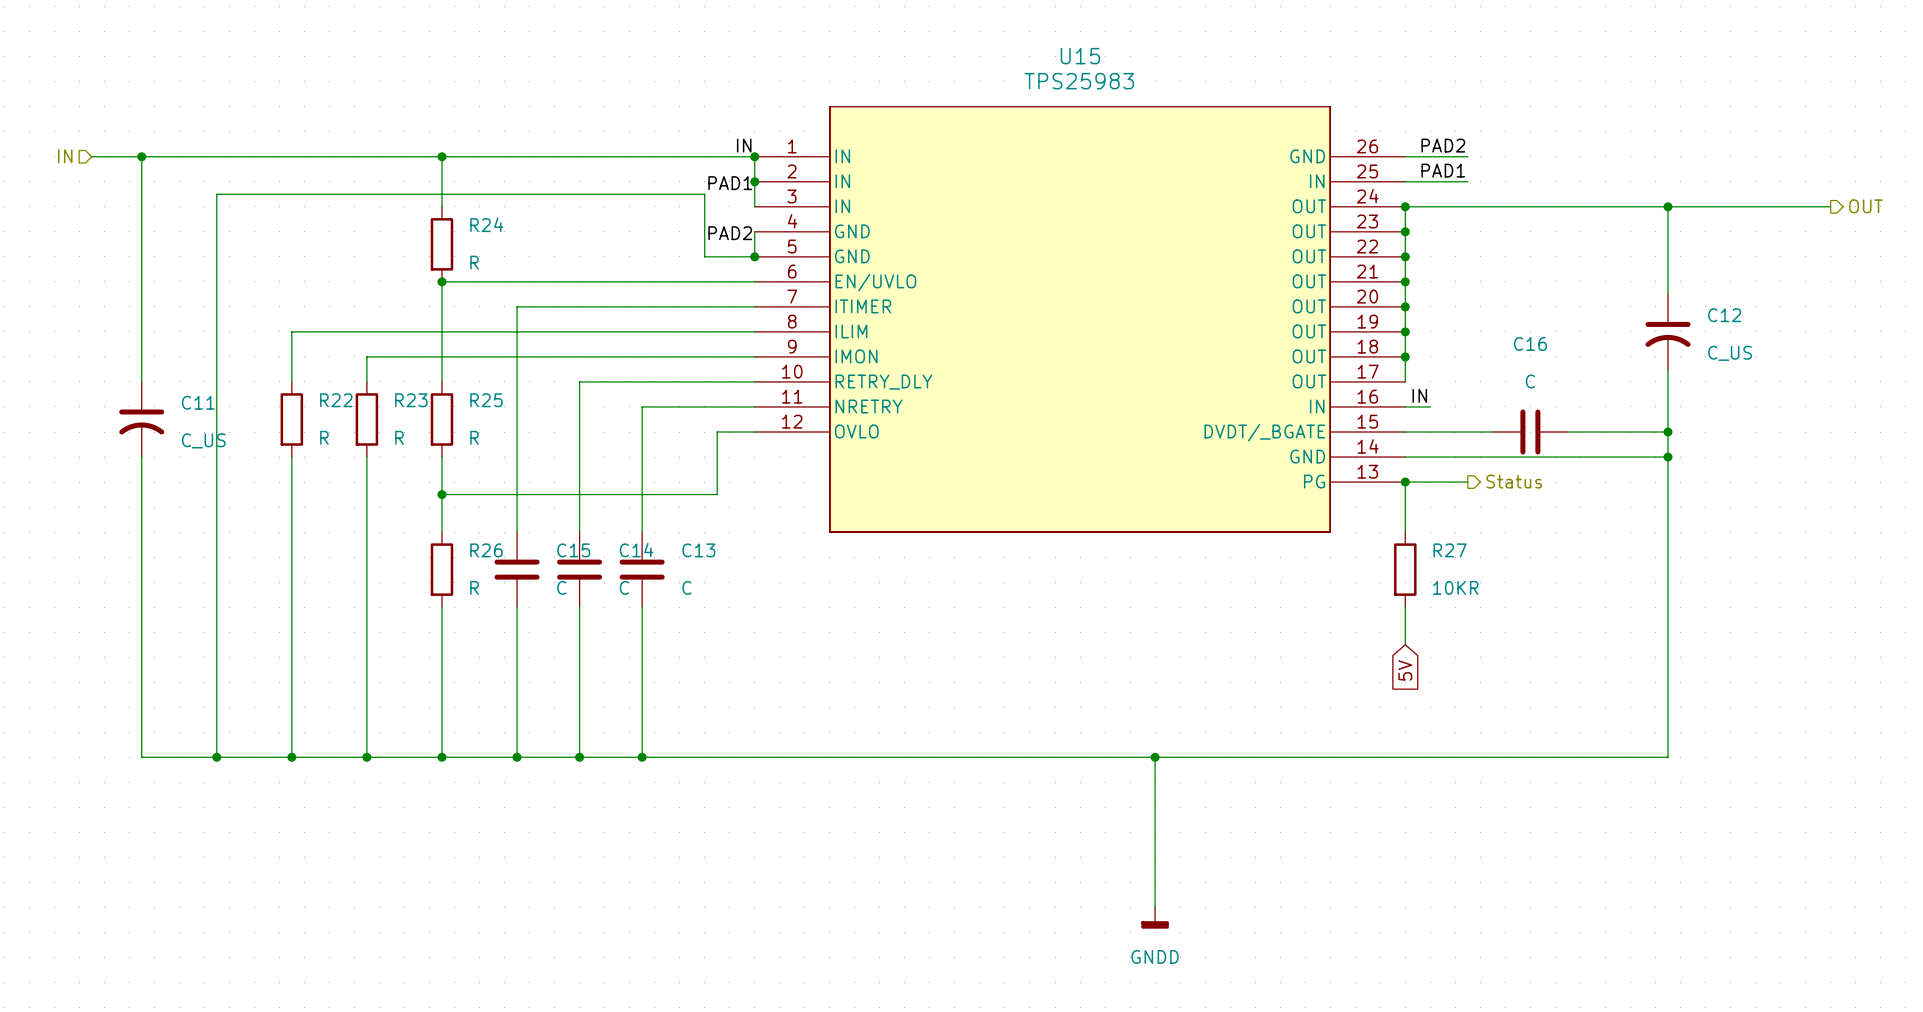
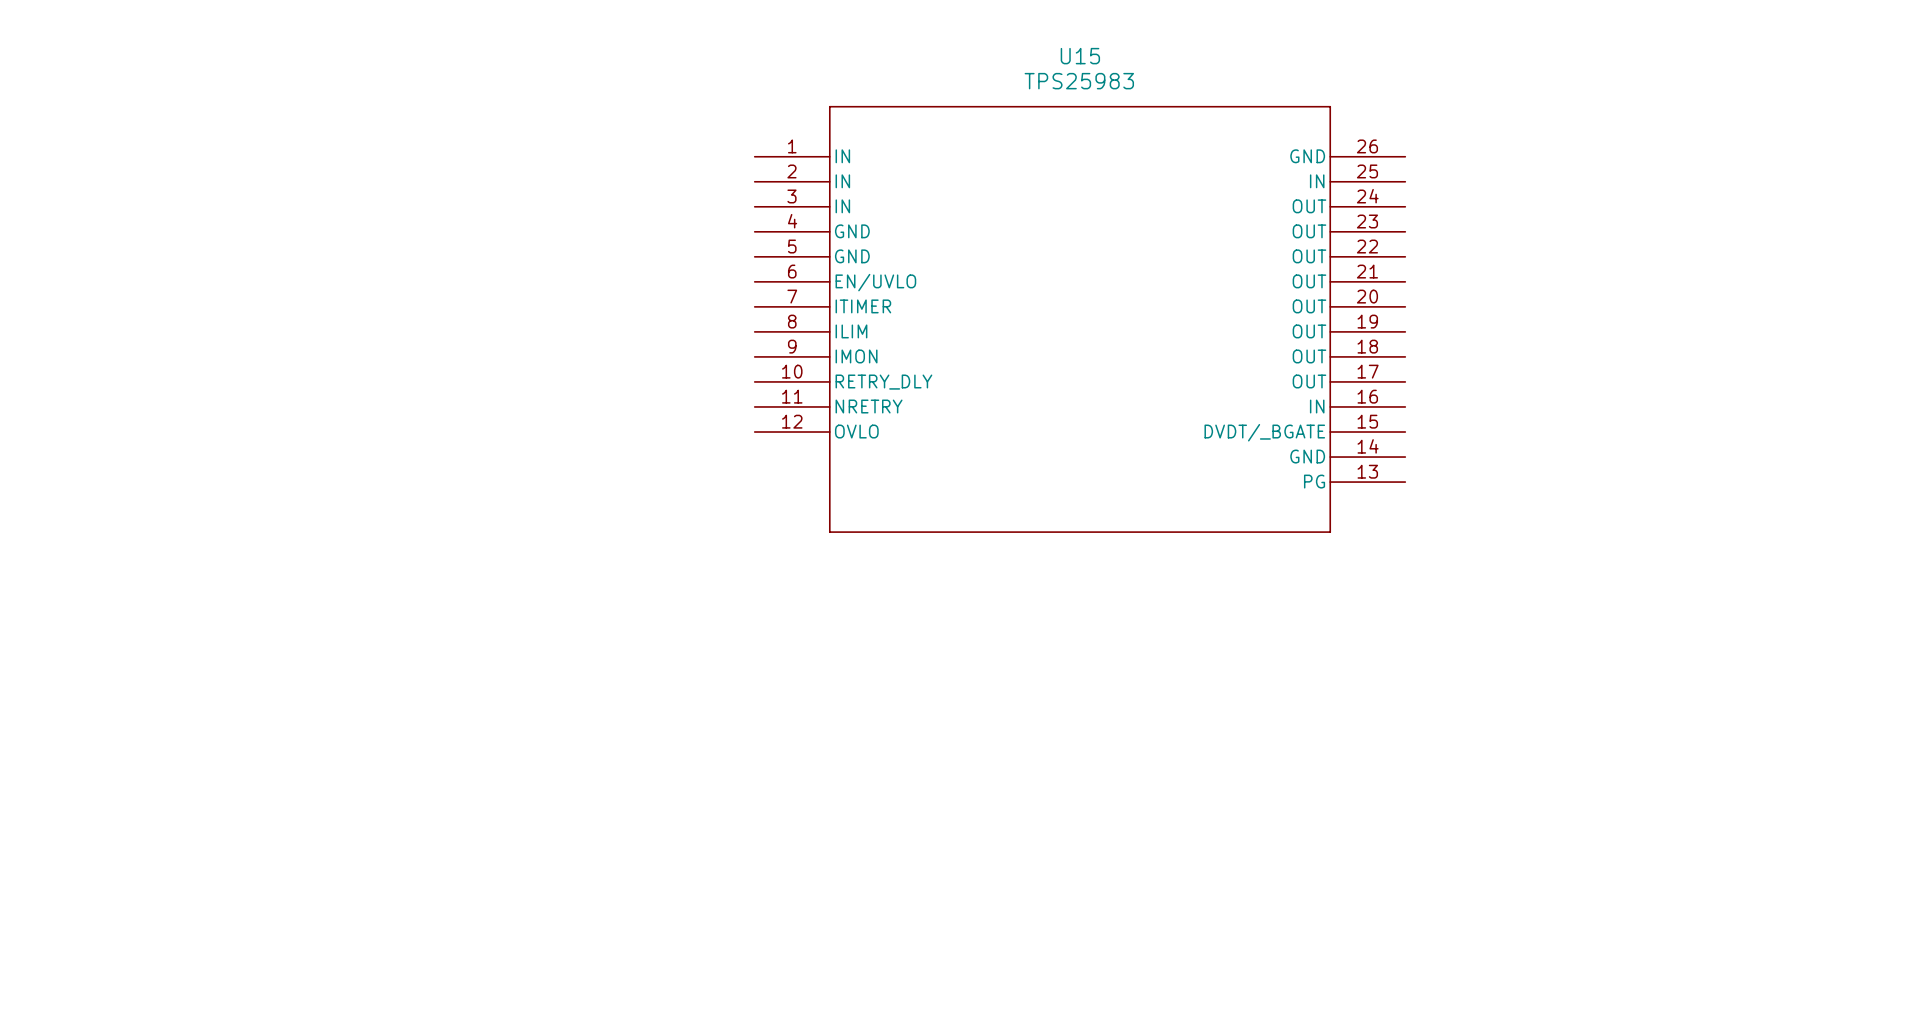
U15 symbol: [754, 106, 1406, 533] -> [754, 106, 1406, 533]
label: IN (744, 145) -> none
label: PAD2 (1443, 145) -> none
hierarchical label: IN (65, 156) -> none
wire: (91, 156) (754, 156) (754, 206) -> none
wire: (141, 156) (141, 381) -> none
junction: (141, 156) -> none
wire: (441, 156) (441, 206) -> none
junction: (441, 156) -> none
junction: (754, 156) -> none
wire: (1405, 156) (1467, 156) -> none
label: PAD1 (1443, 170) -> none
junction: (754, 181) -> none
wire: (1405, 181) (1467, 181) -> none
label: PAD1 (730, 183) -> none
junction: (1405, 206) -> none
wire: (1668, 206) (1668, 294) -> none
junction: (1668, 206) -> none
wire: (1830, 206) (1405, 206) (1405, 381) -> none
hierarchical label: OUT (1866, 206) -> none
wire: (754, 231) (754, 256) (704, 256) (704, 194) (216, 194) (216, 757) -> none
junction: (1405, 231) -> none
label: PAD2 (730, 233) -> none
R24: R (441, 244) -> none
junction: (754, 256) -> none
junction: (1405, 256) -> none
junction: (441, 281) -> none
wire: (754, 281) (441, 281) (441, 381) -> none
junction: (1405, 281) -> none
wire: (754, 306) (517, 306) (517, 532) -> none
junction: (1405, 306) -> none
wire: (754, 331) (291, 331) (291, 381) -> none
junction: (1405, 331) -> none
C12: C_US (1668, 331) -> none
wire: (754, 356) (366, 356) (366, 381) -> none
junction: (1405, 356) -> none
wire: (1668, 369) (1668, 757) (141, 757) (141, 457) -> none
wire: (754, 381) (579, 381) (579, 532) -> none
label: IN (1419, 395) -> none
wire: (754, 406) (642, 406) (642, 532) -> none
wire: (1405, 406) (1430, 406) -> none
C11: C_US (141, 419) -> none
R22: R (291, 419) -> none
R23: R (366, 419) -> none
R25: R (441, 419) -> none
wire: (754, 432) (717, 432) (717, 494) (441, 494) -> none
wire: (1405, 432) (1492, 432) -> none
C16: C (1530, 432) -> none
wire: (1567, 432) (1668, 432) -> none
junction: (1668, 432) -> none
wire: (291, 457) (291, 757) -> none
wire: (366, 457) (366, 757) -> none
wire: (441, 457) (441, 532) -> none
wire: (1405, 457) (1668, 457) -> none
junction: (1668, 457) -> none
hierarchical label: Status (1514, 481) -> none
junction: (1405, 482) -> none
wire: (1467, 482) (1405, 482) (1405, 532) -> none
junction: (441, 494) -> none
R26: R (441, 569) -> none
C15: C (517, 569) -> none
C14: C (579, 569) -> none
C13: C (642, 569) -> none
R27: 10KR (1405, 569) -> none
wire: (441, 607) (441, 757) -> none
wire: (517, 607) (517, 757) -> none
wire: (579, 607) (579, 757) -> none
wire: (642, 607) (642, 757) -> none
wire: (1405, 607) (1405, 644) -> none
global label: 5V (1405, 670) -> none
junction: (216, 757) -> none
junction: (291, 757) -> none
junction: (366, 757) -> none
junction: (441, 757) -> none
junction: (517, 757) -> none
junction: (579, 757) -> none
junction: (642, 757) -> none
wire: (1155, 757) (1155, 907) -> none
junction: (1155, 757) -> none
power symbol: GNDD (1155, 918) -> none

